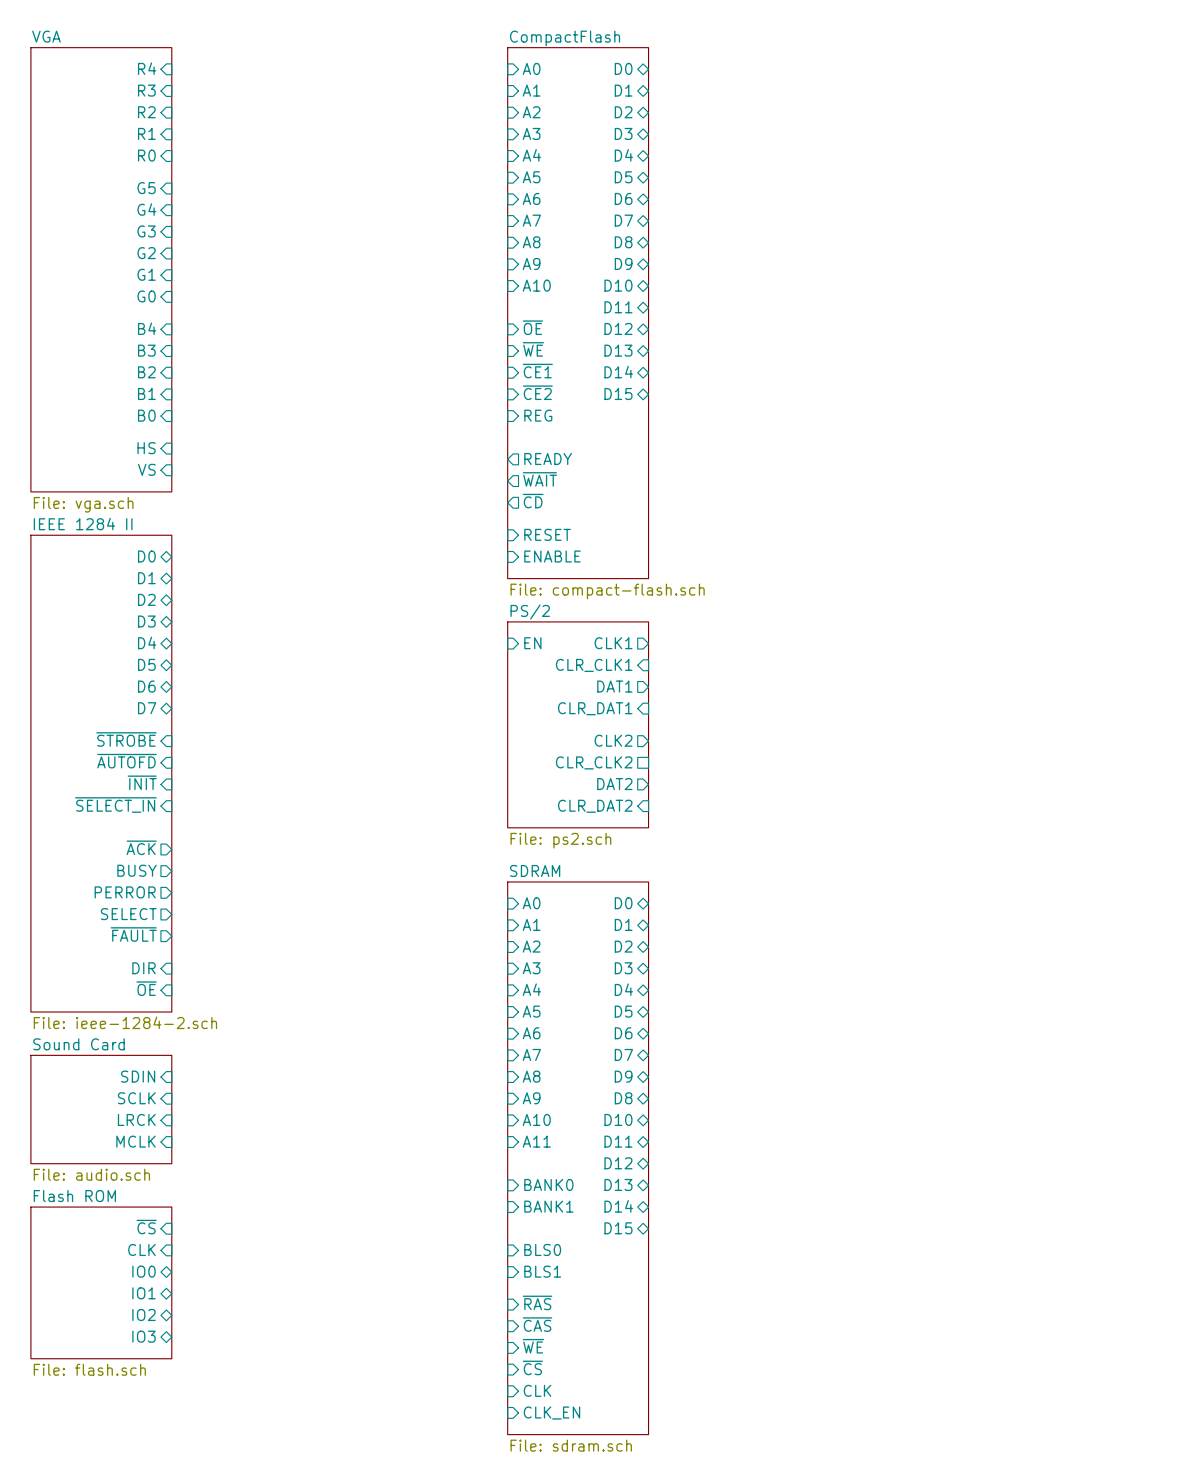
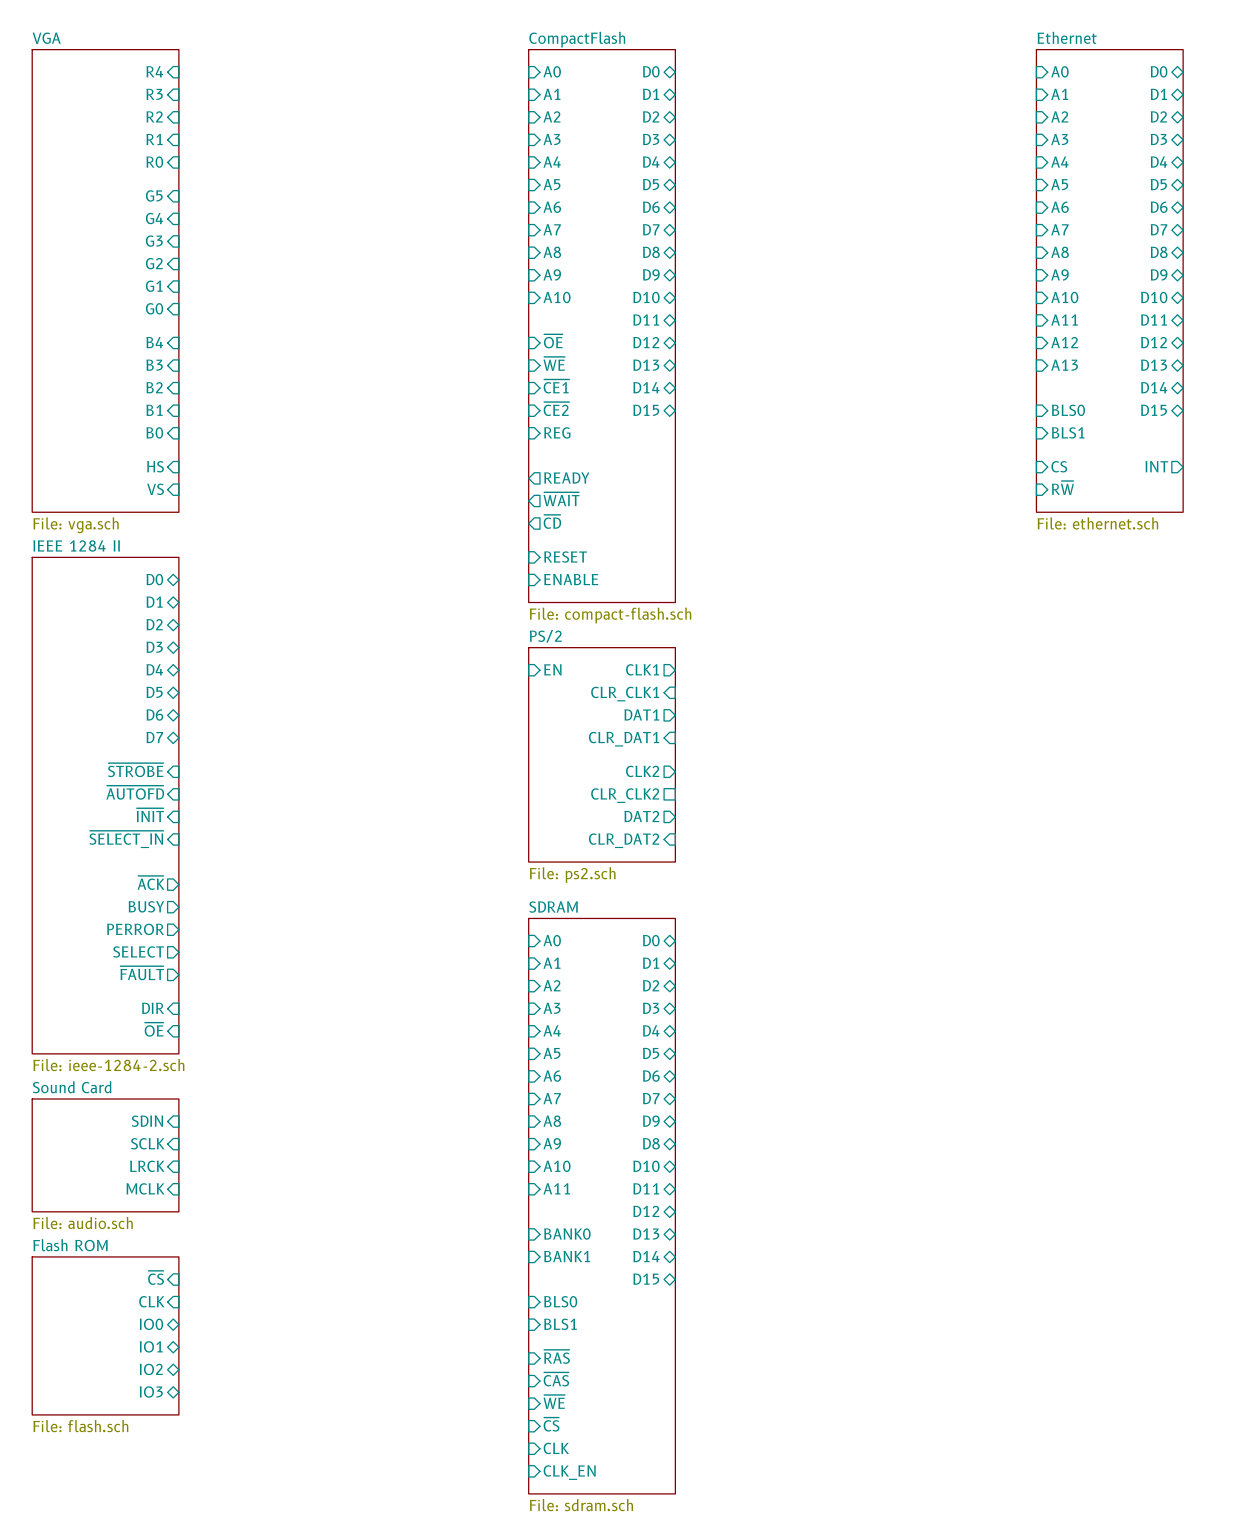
sheet pin: none -> A0 (1059, 71)
sheet pin: none -> D0 (1159, 71)
sheet pin: none -> A1 (1059, 94)
sheet pin: none -> D1 (1158, 94)
sheet pin: none -> A2 (1059, 116)
sheet pin: none -> D2 (1158, 116)
sheet pin: none -> A3 (1059, 139)
sheet pin: none -> D3 (1158, 139)
sheet pin: none -> A4 (1059, 162)
sheet pin: none -> D4 (1159, 162)
sheet pin: none -> A5 (1059, 184)
sheet pin: none -> D5 (1158, 184)
sheet pin: none -> A6 (1060, 207)
sheet pin: none -> D6 (1159, 207)
sheet pin: none -> A7 (1059, 229)
sheet pin: none -> D7 (1159, 229)
sheet pin: none -> A8 (1060, 252)
sheet pin: none -> D8 (1159, 252)
sheet pin: none -> A9 (1059, 274)
sheet pin: none -> D9 (1159, 274)
sheet Ethernet: none -> File: ethernet.sch (1109, 280)
sheet pin: none -> A10 (1064, 297)
sheet pin: none -> D10 (1154, 297)
sheet pin: none -> A11 (1064, 320)
sheet pin: none -> D11 (1154, 320)
sheet pin: none -> A12 (1064, 342)
sheet pin: none -> D12 (1154, 342)
sheet pin: none -> A13 (1064, 365)
sheet pin: none -> D13 (1154, 365)
sheet pin: none -> D14 (1154, 387)
sheet pin: none -> BLS0 (1068, 410)
sheet pin: none -> D15 (1154, 410)
sheet pin: none -> BLS1 (1068, 432)
sheet pin: none -> CS (1059, 466)
sheet pin: none -> INT (1156, 466)
sheet pin: none -> R~{W} (1062, 487)

